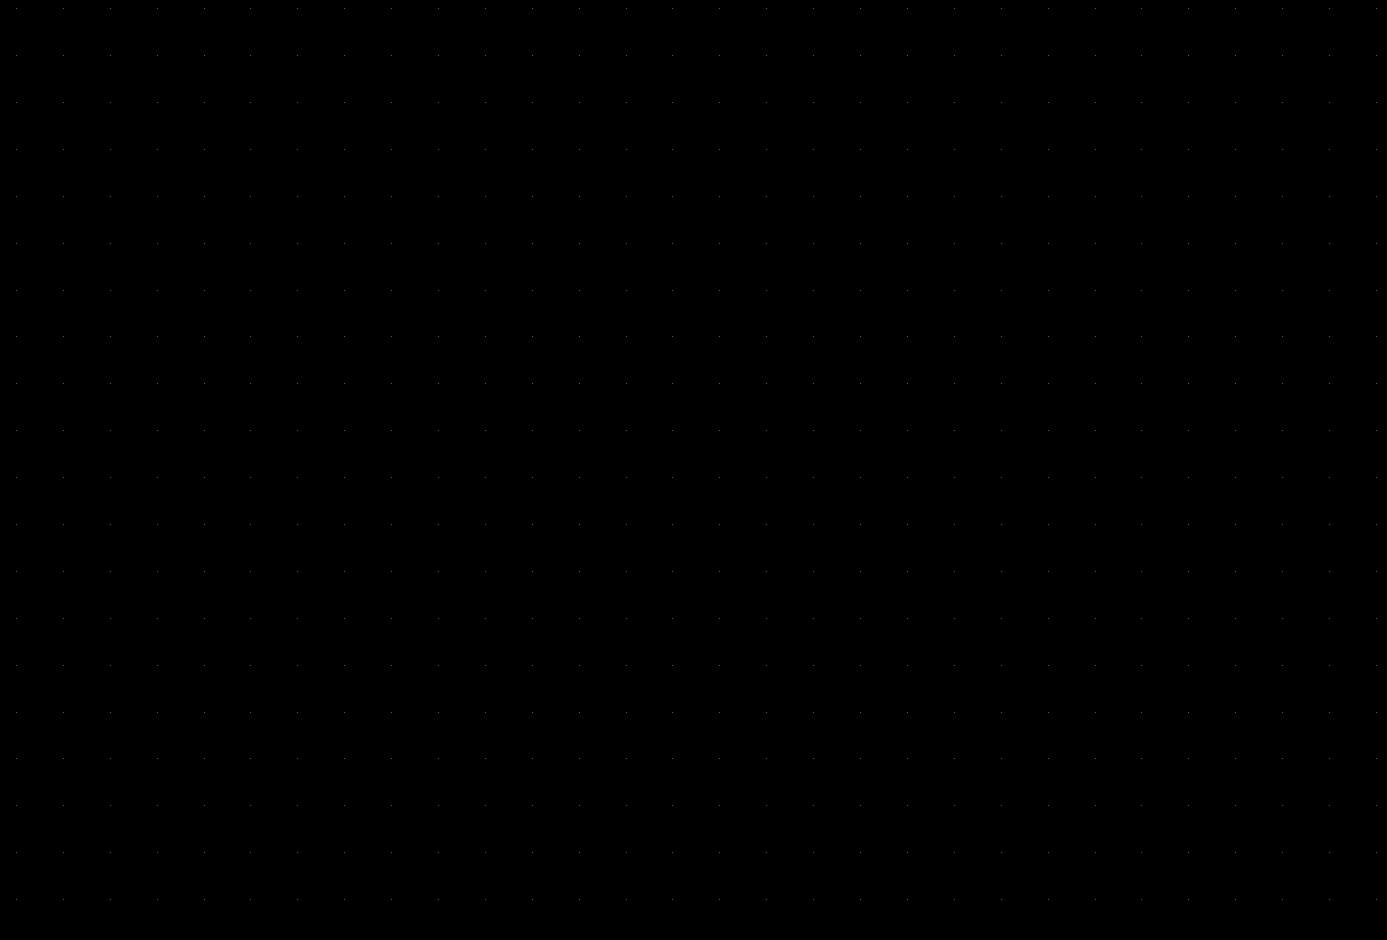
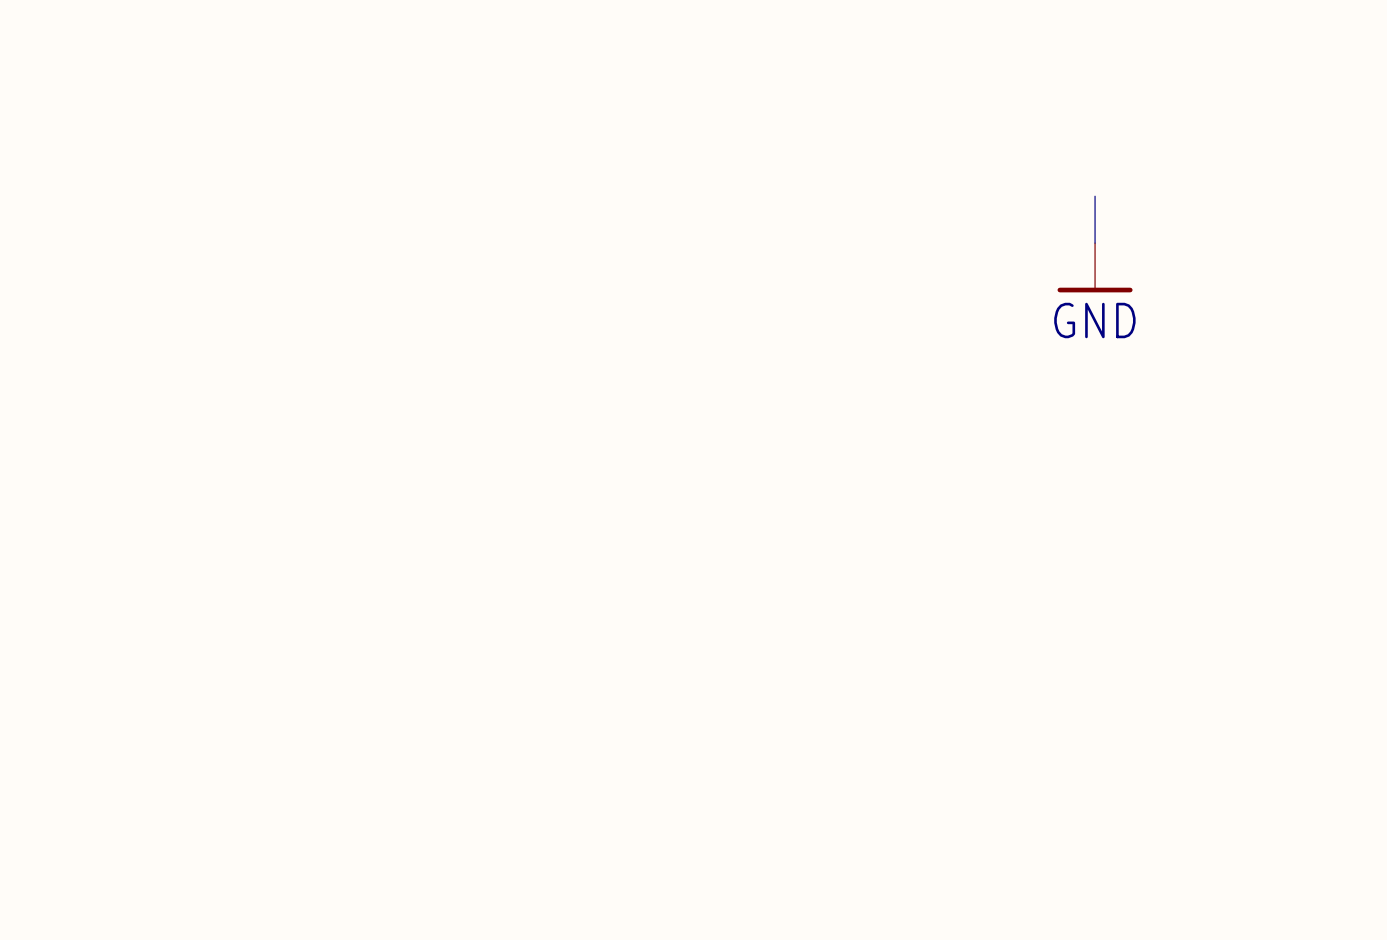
wire: none -> (1095, 196) (1095, 243)
power symbol: none -> GND (1095, 267)

